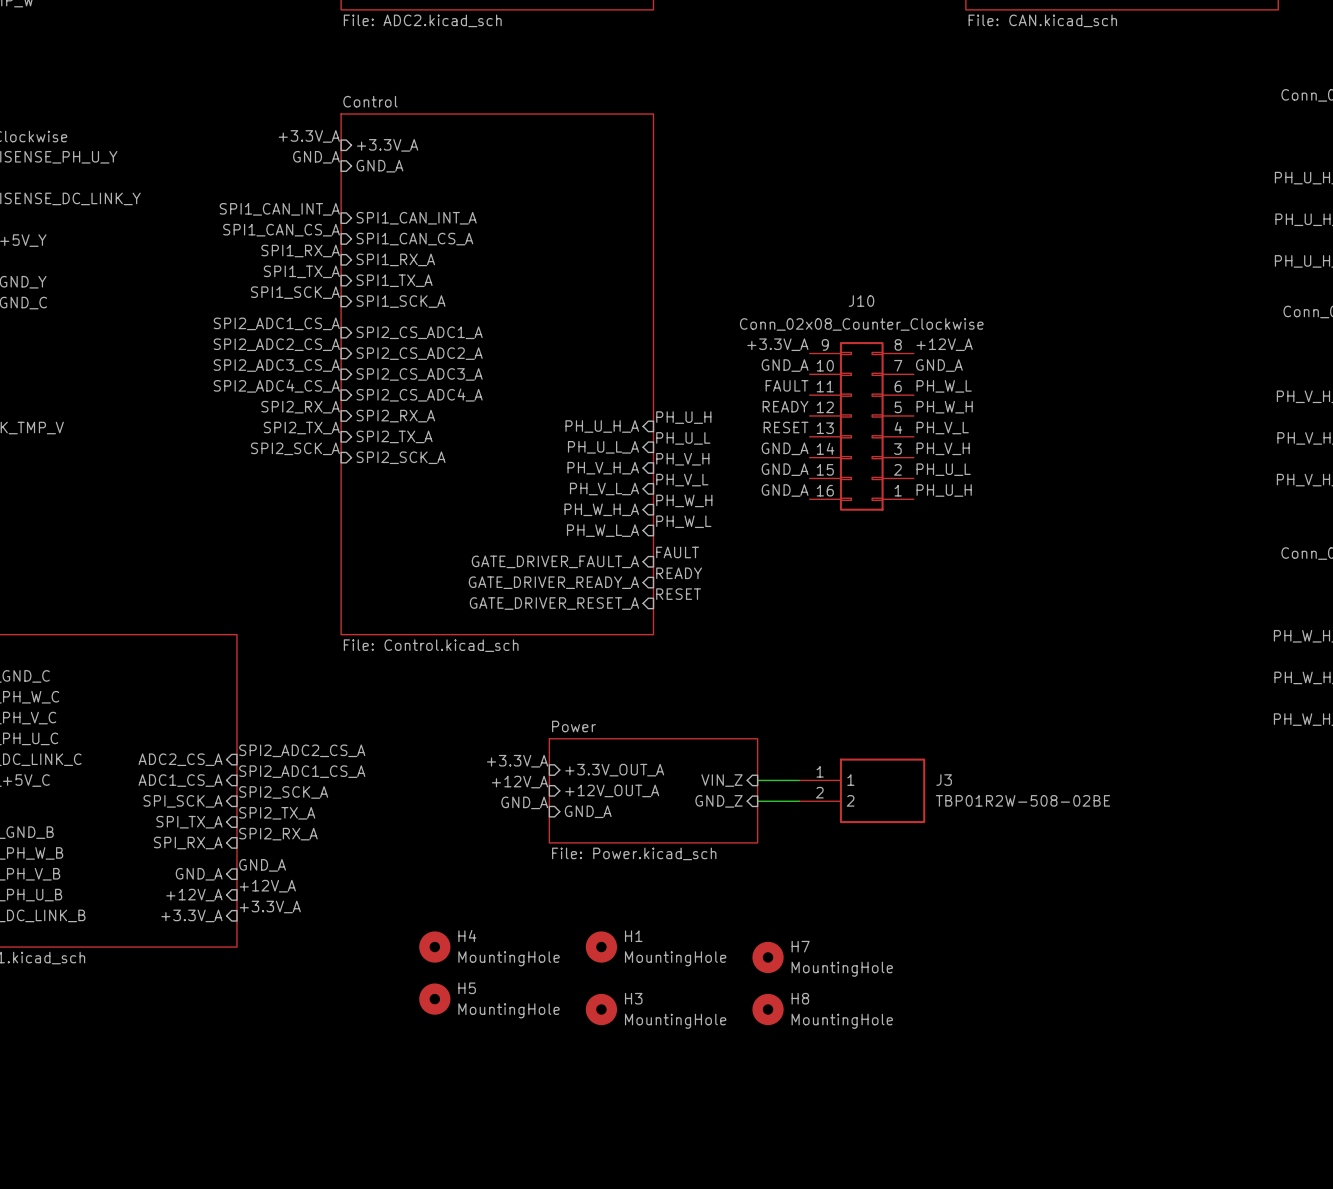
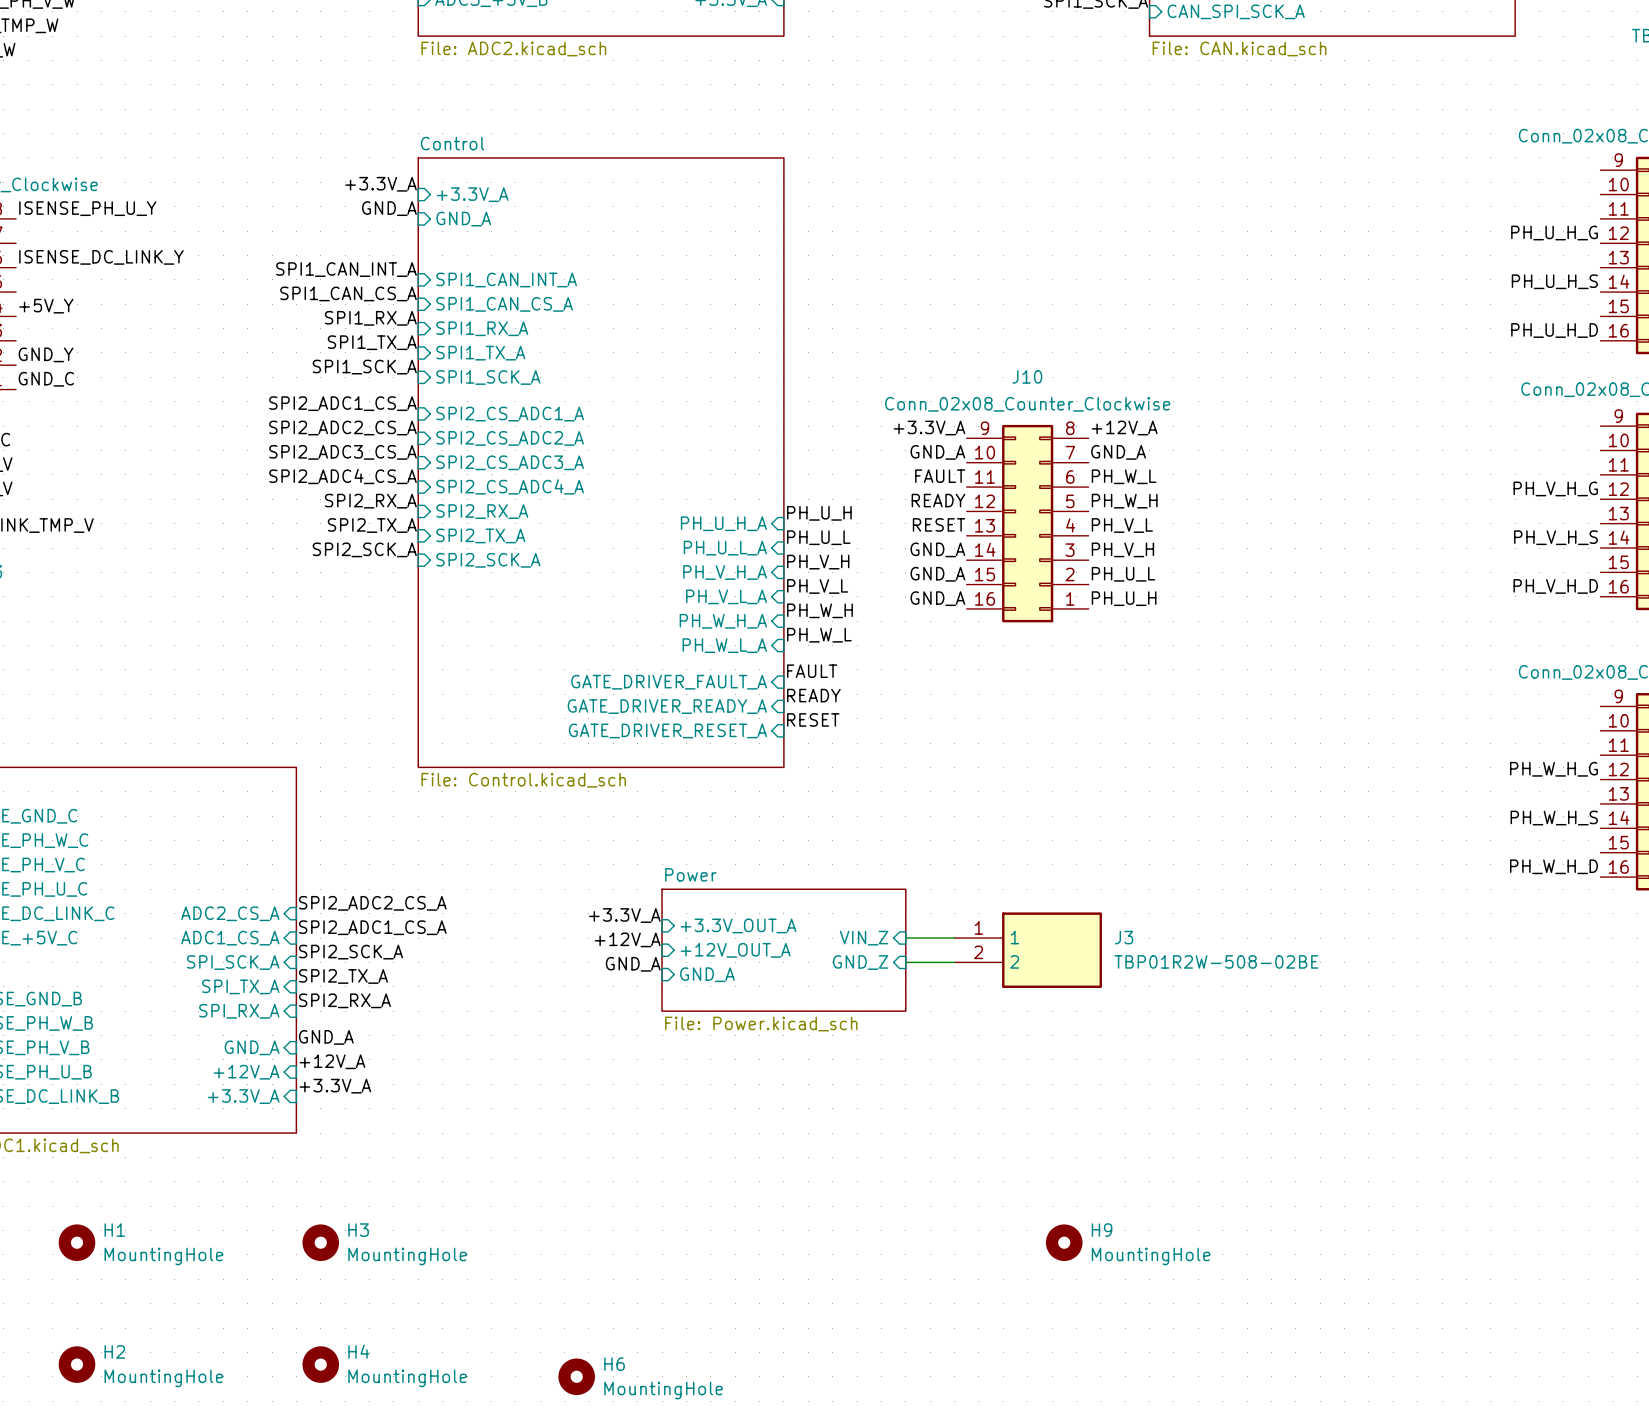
H4 position: (434, 947) -> (320, 1364)
H1 position: (601, 947) -> (77, 1242)
H7: MountingHole (768, 957) -> none
H5: MountingHole (434, 999) -> none
H3 position: (601, 1009) -> (320, 1242)
H8: MountingHole (768, 1009) -> none
H9: none -> MountingHole (1064, 1242)
H2: none -> MountingHole (77, 1364)
H6: none -> MountingHole (576, 1376)

